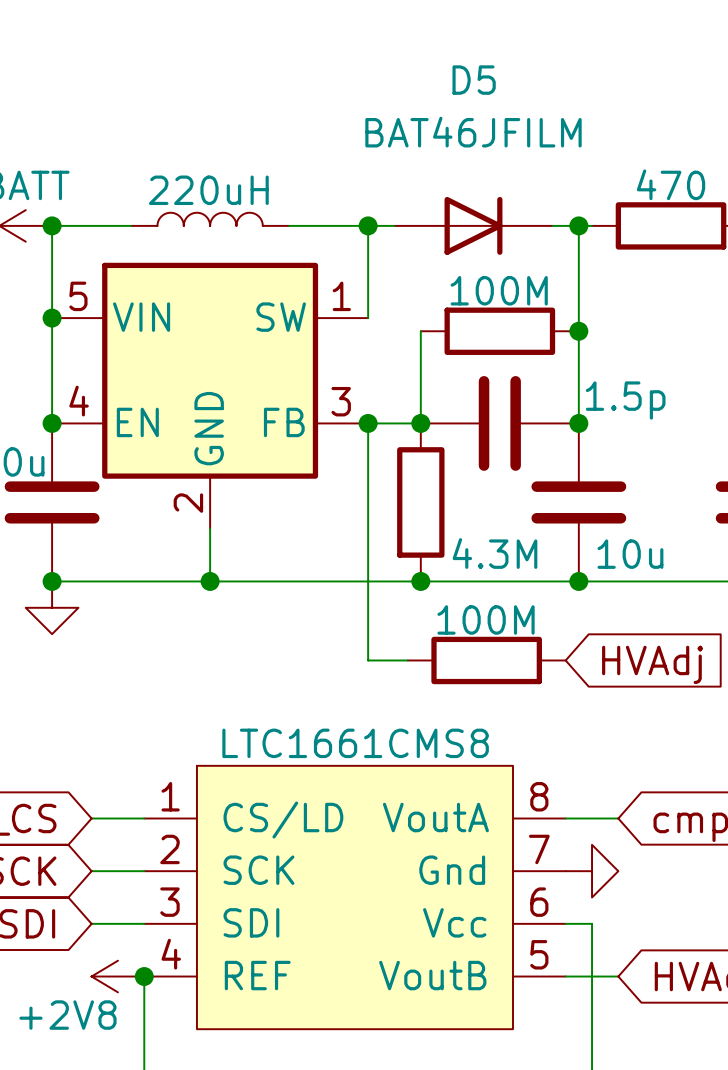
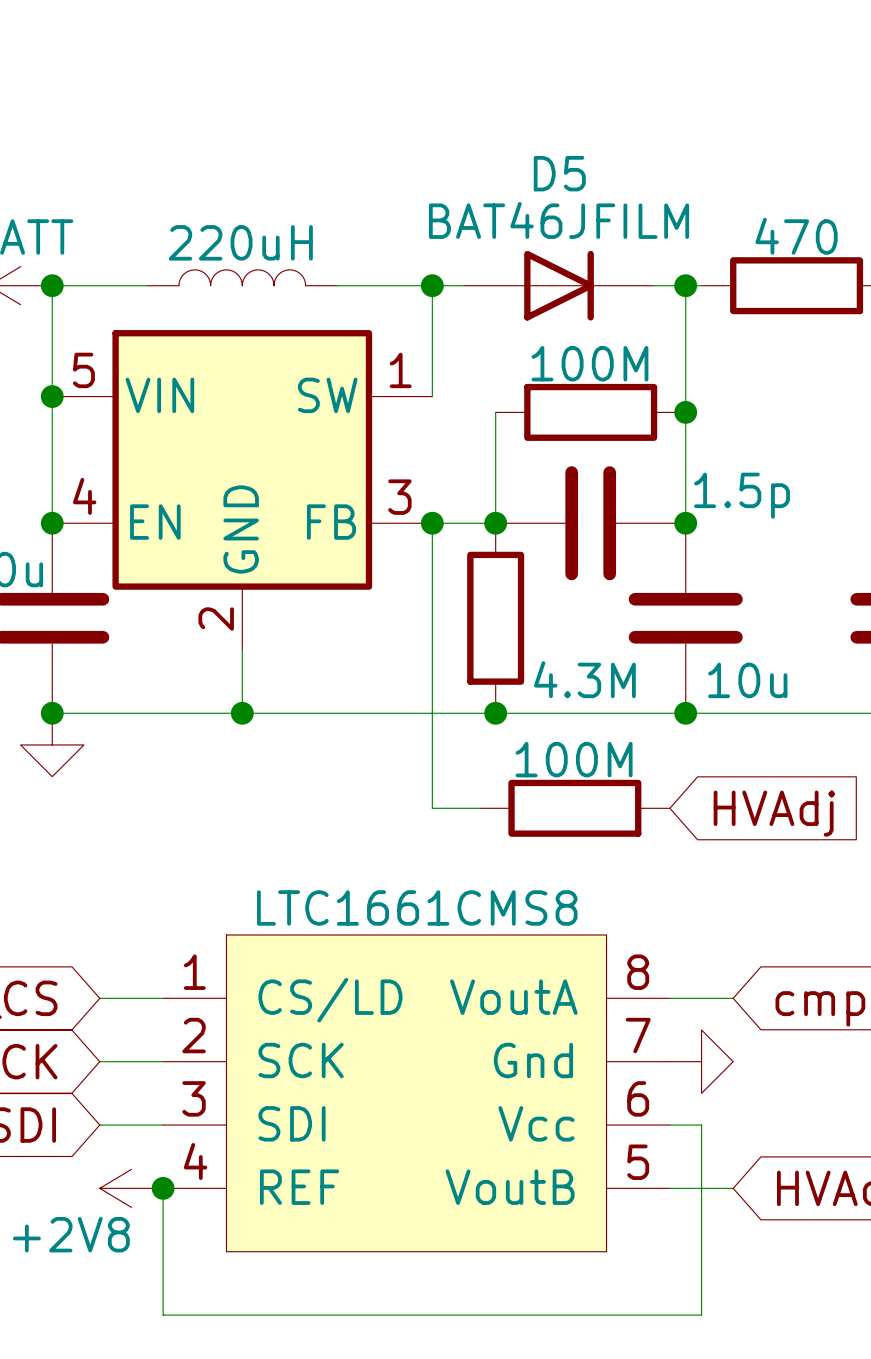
D5 name position: D5 (474, 80) -> D5 (559, 173)
D5 value position: BAT46JFILM (473, 132) -> BAT46JFILM (559, 220)

